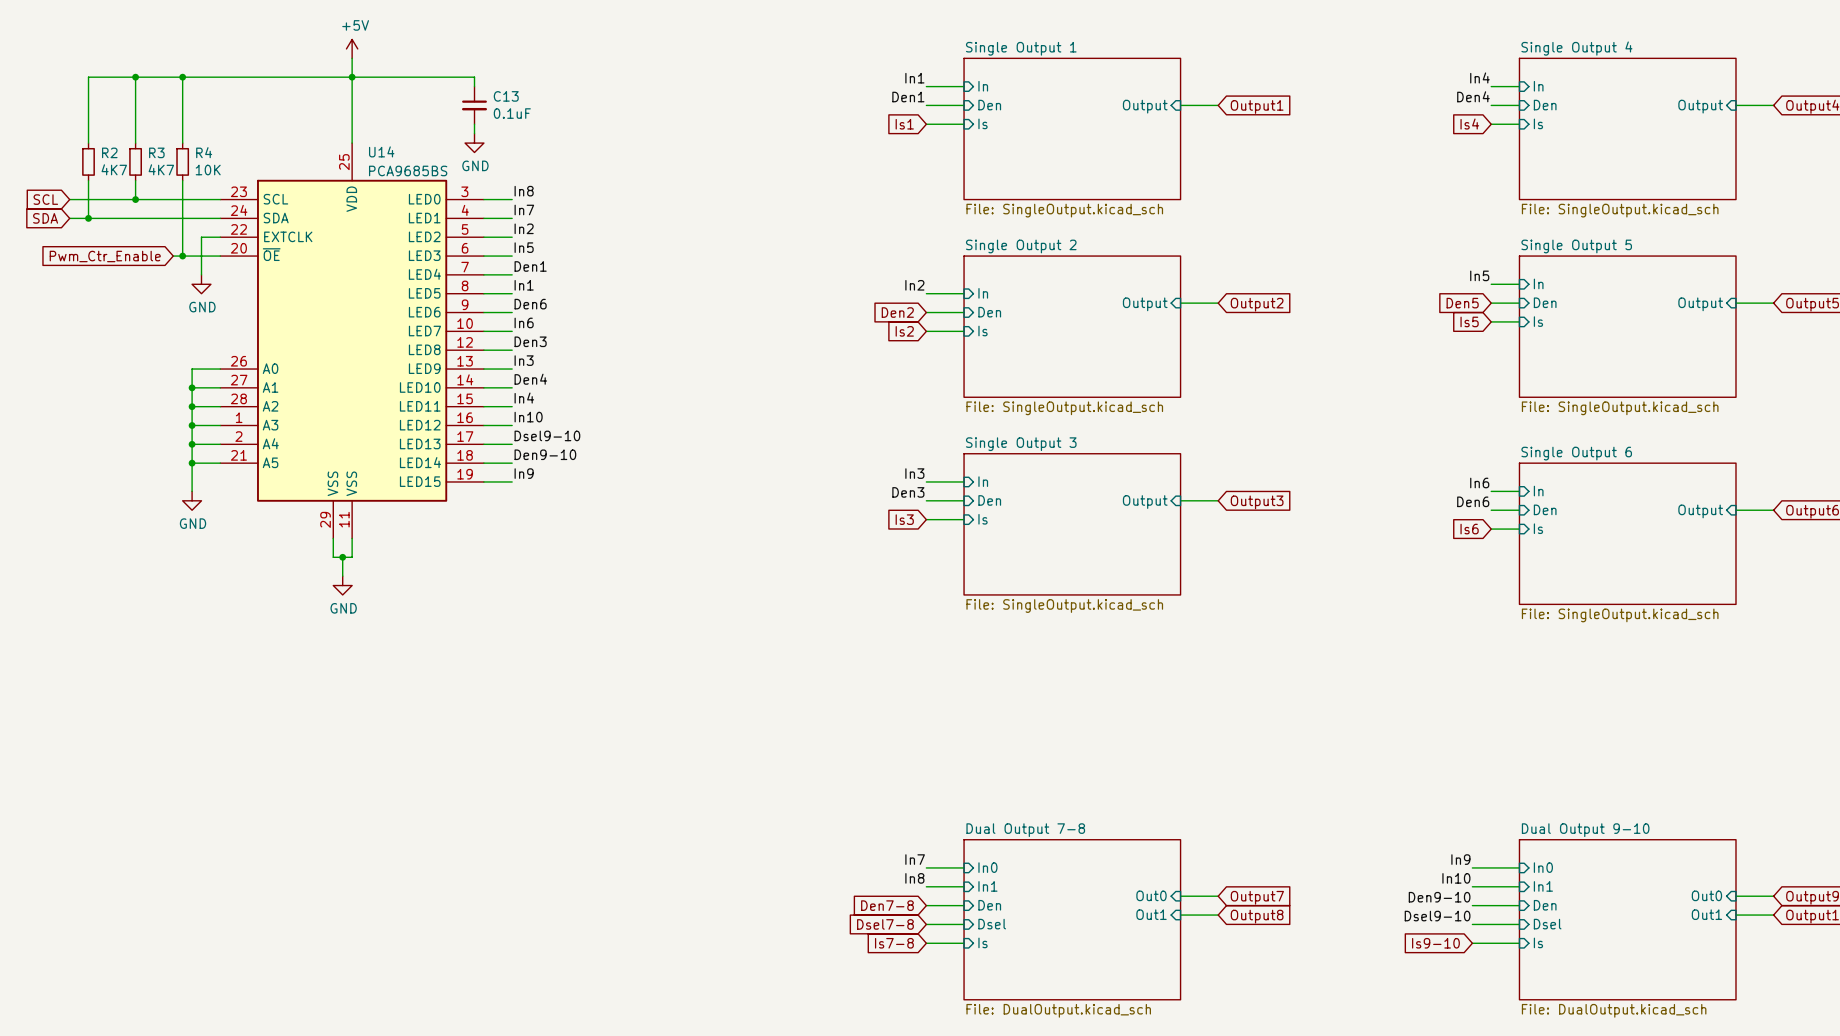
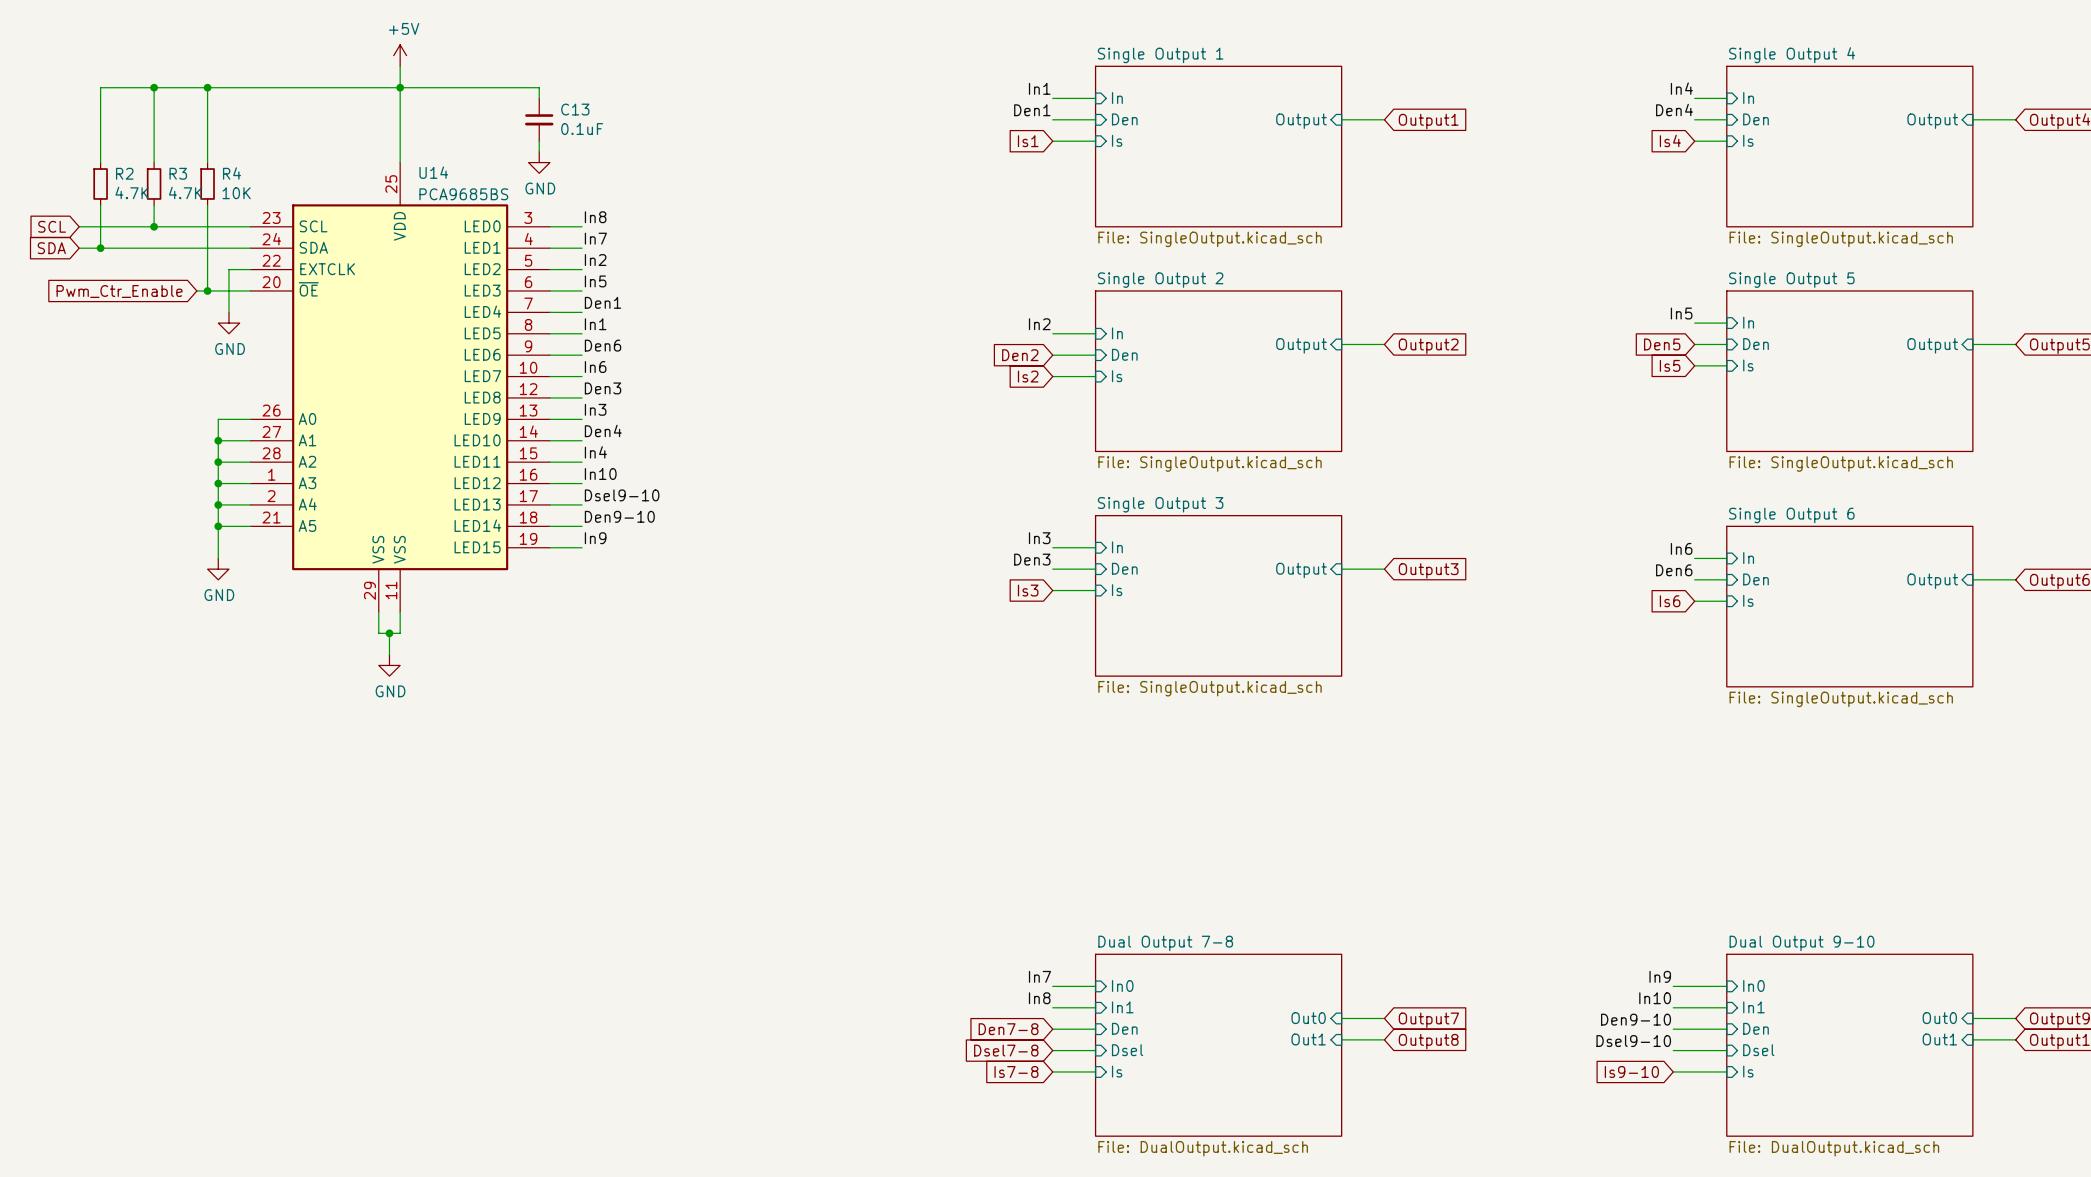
R2 value: 4K7 (114, 169) -> 4.7K (132, 192)
R3 value: 4K7 (161, 169) -> 4.7K (185, 192)

